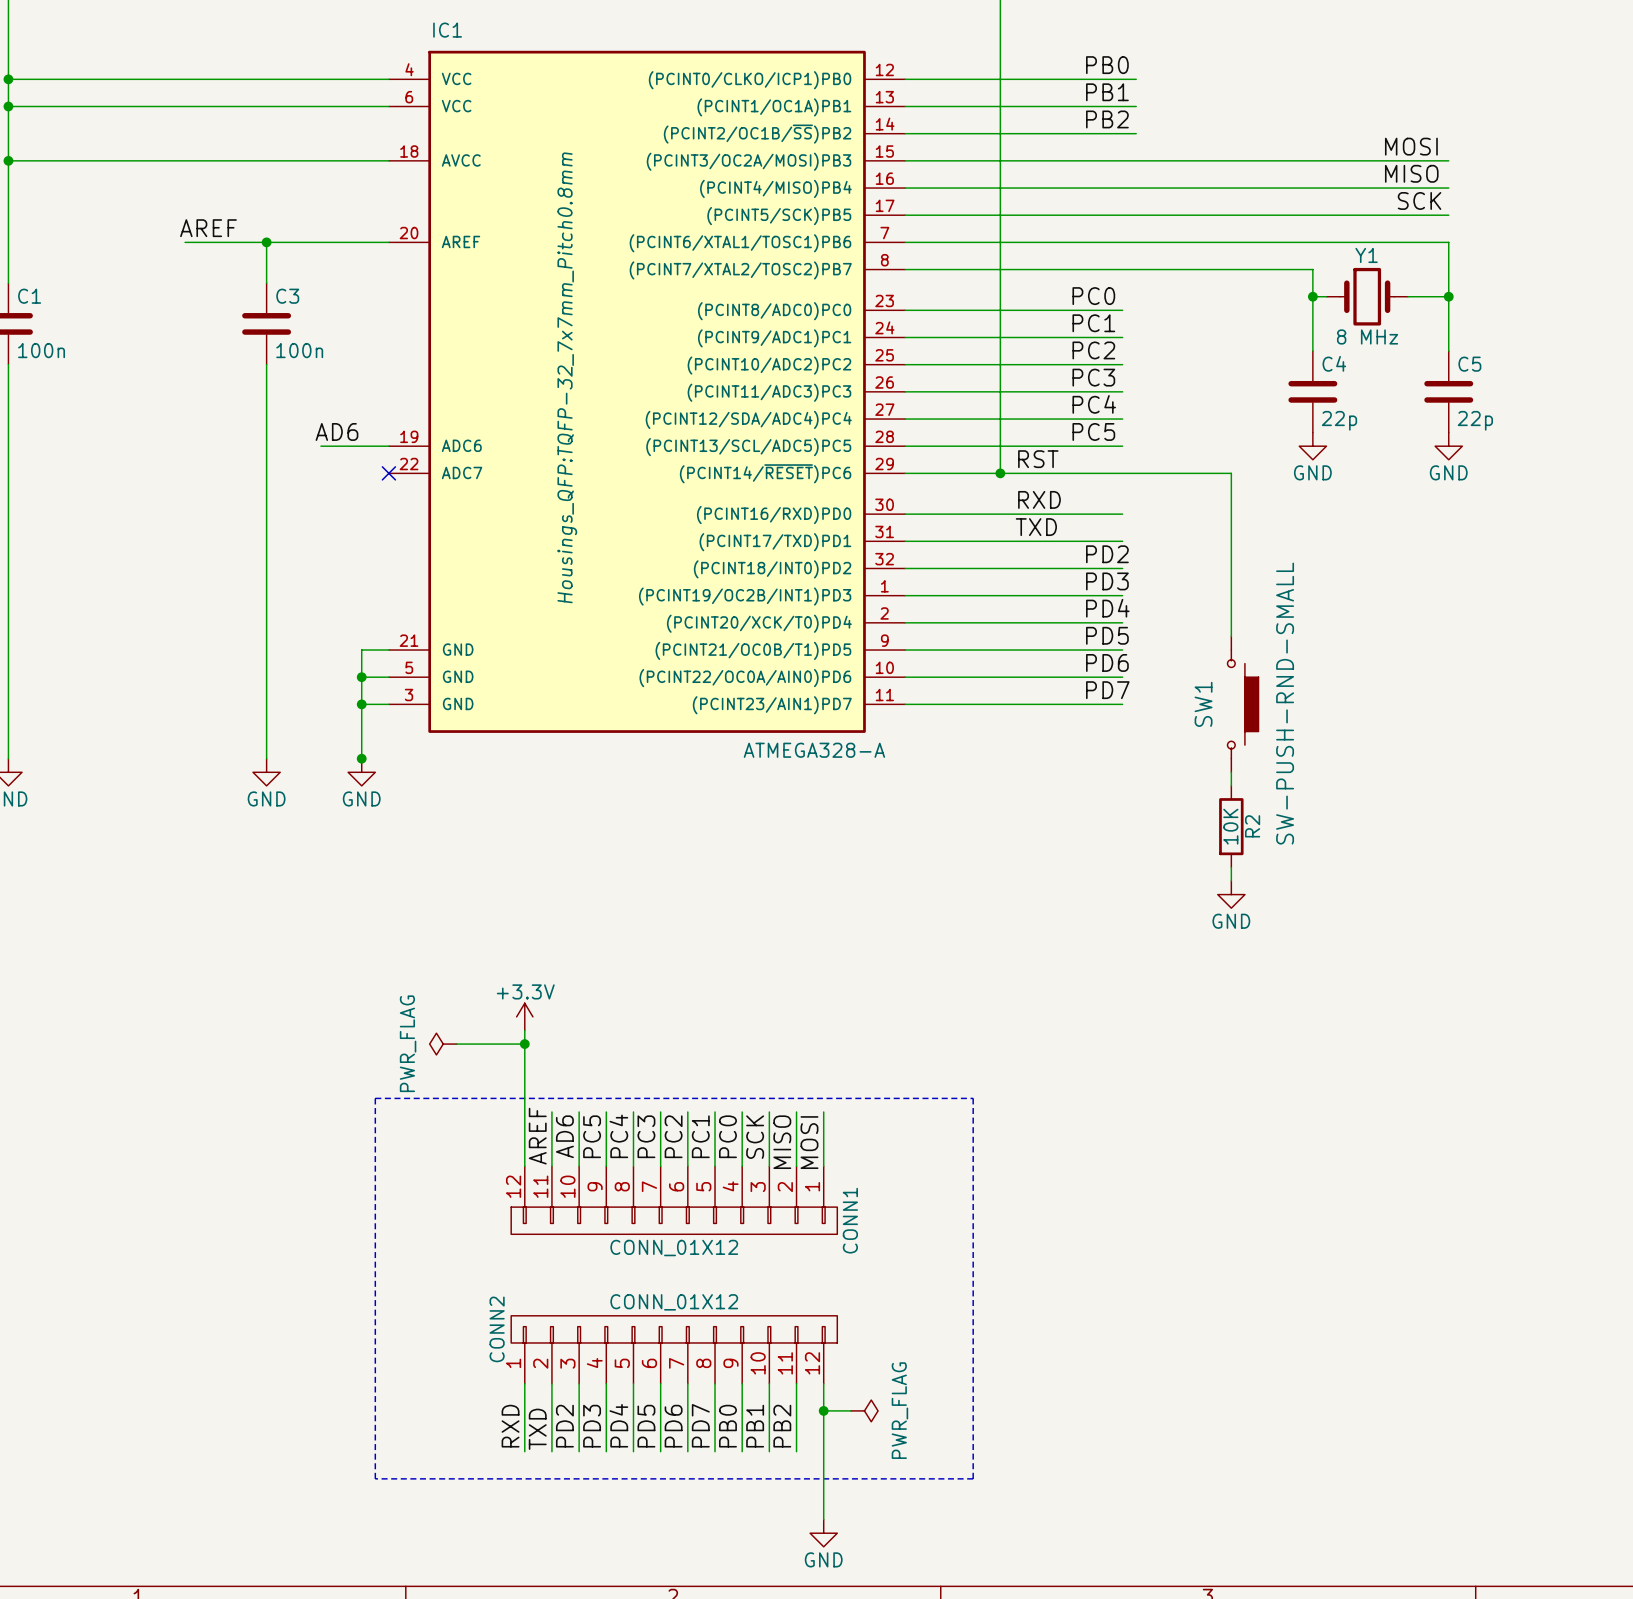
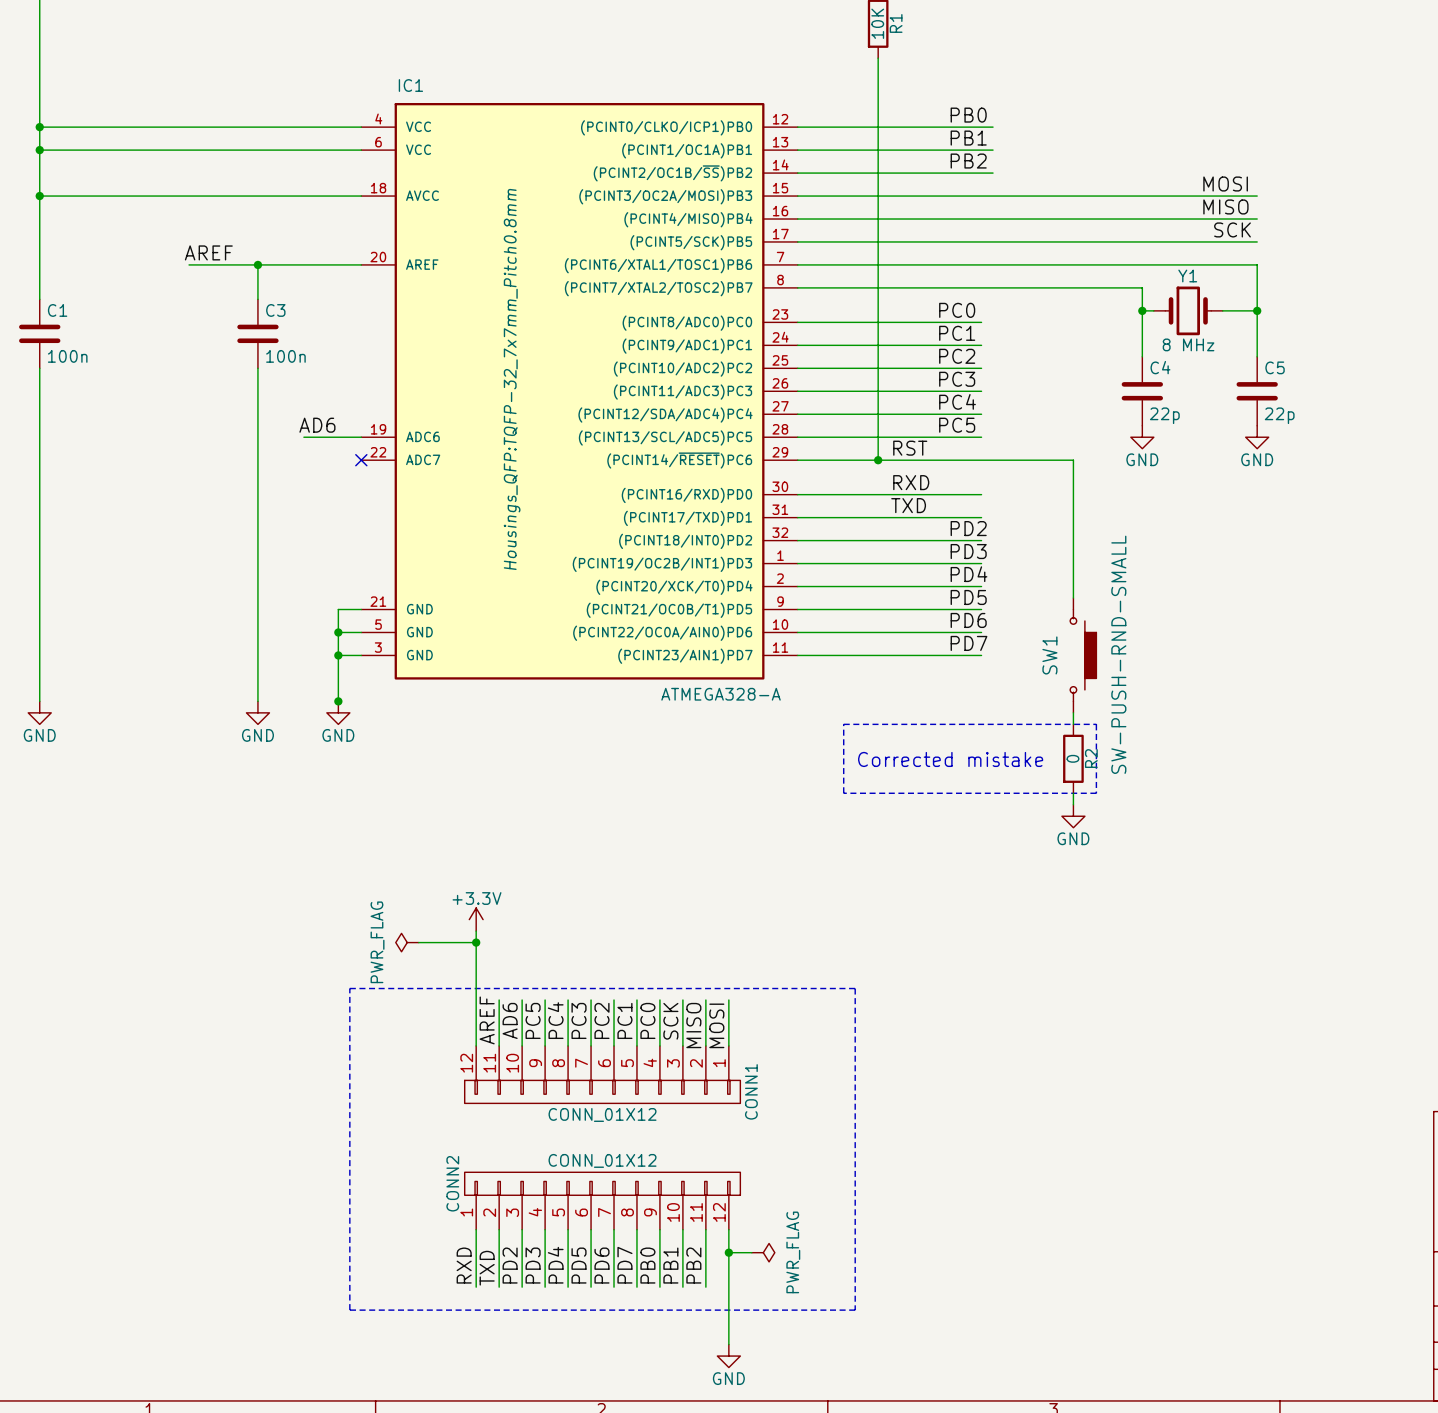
line: none -> (843, 724) (843, 793) (1096, 793) (1096, 724) (843, 724)
R2 value: 10K (1230, 826) -> 0 (1072, 758)
text: none -> Corrected mistake (950, 759)

